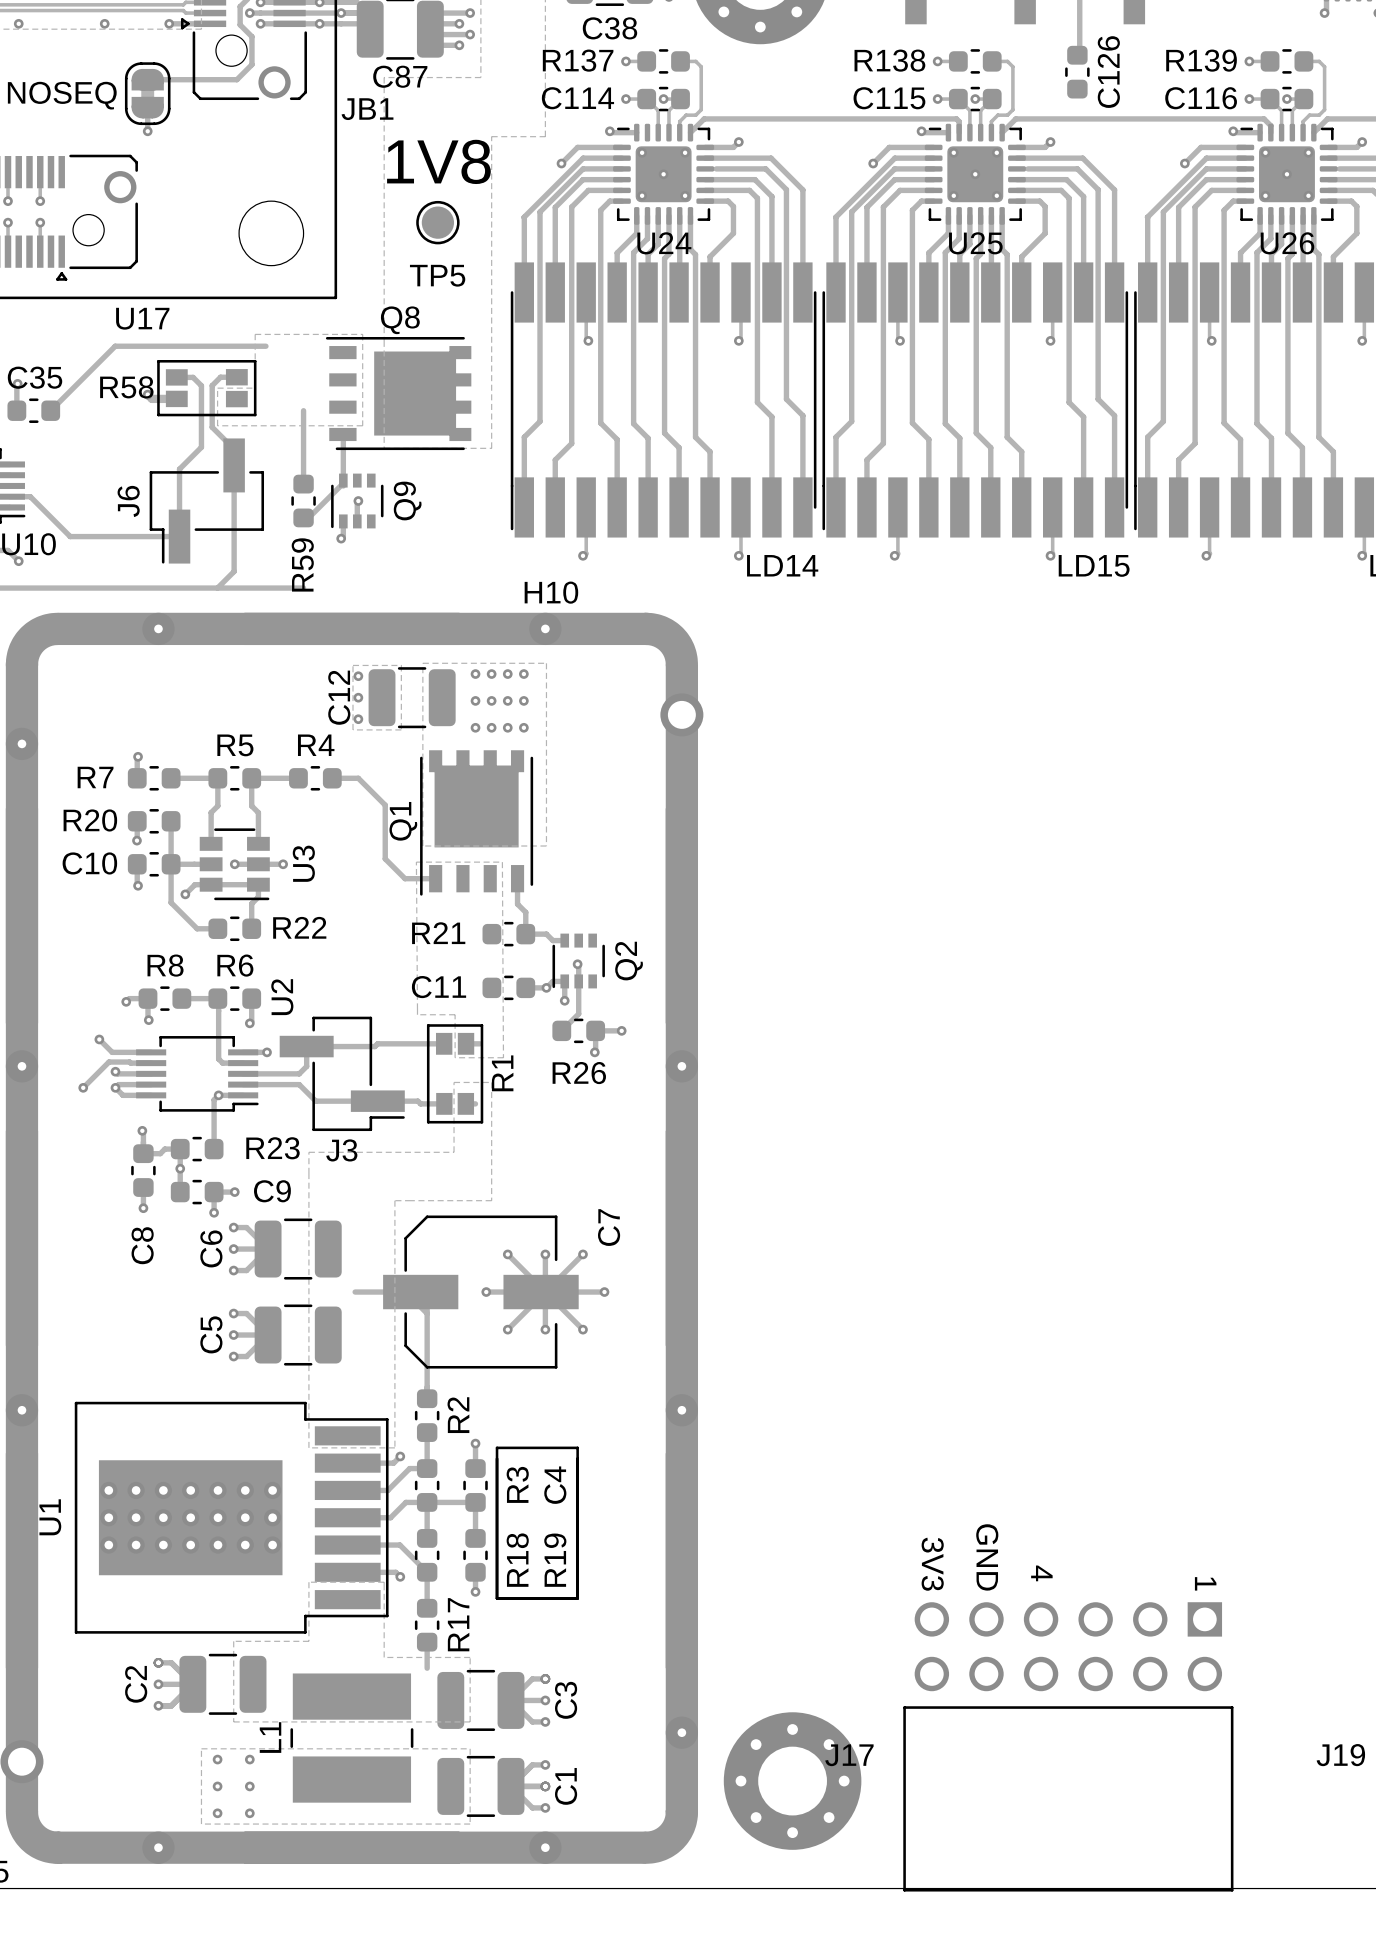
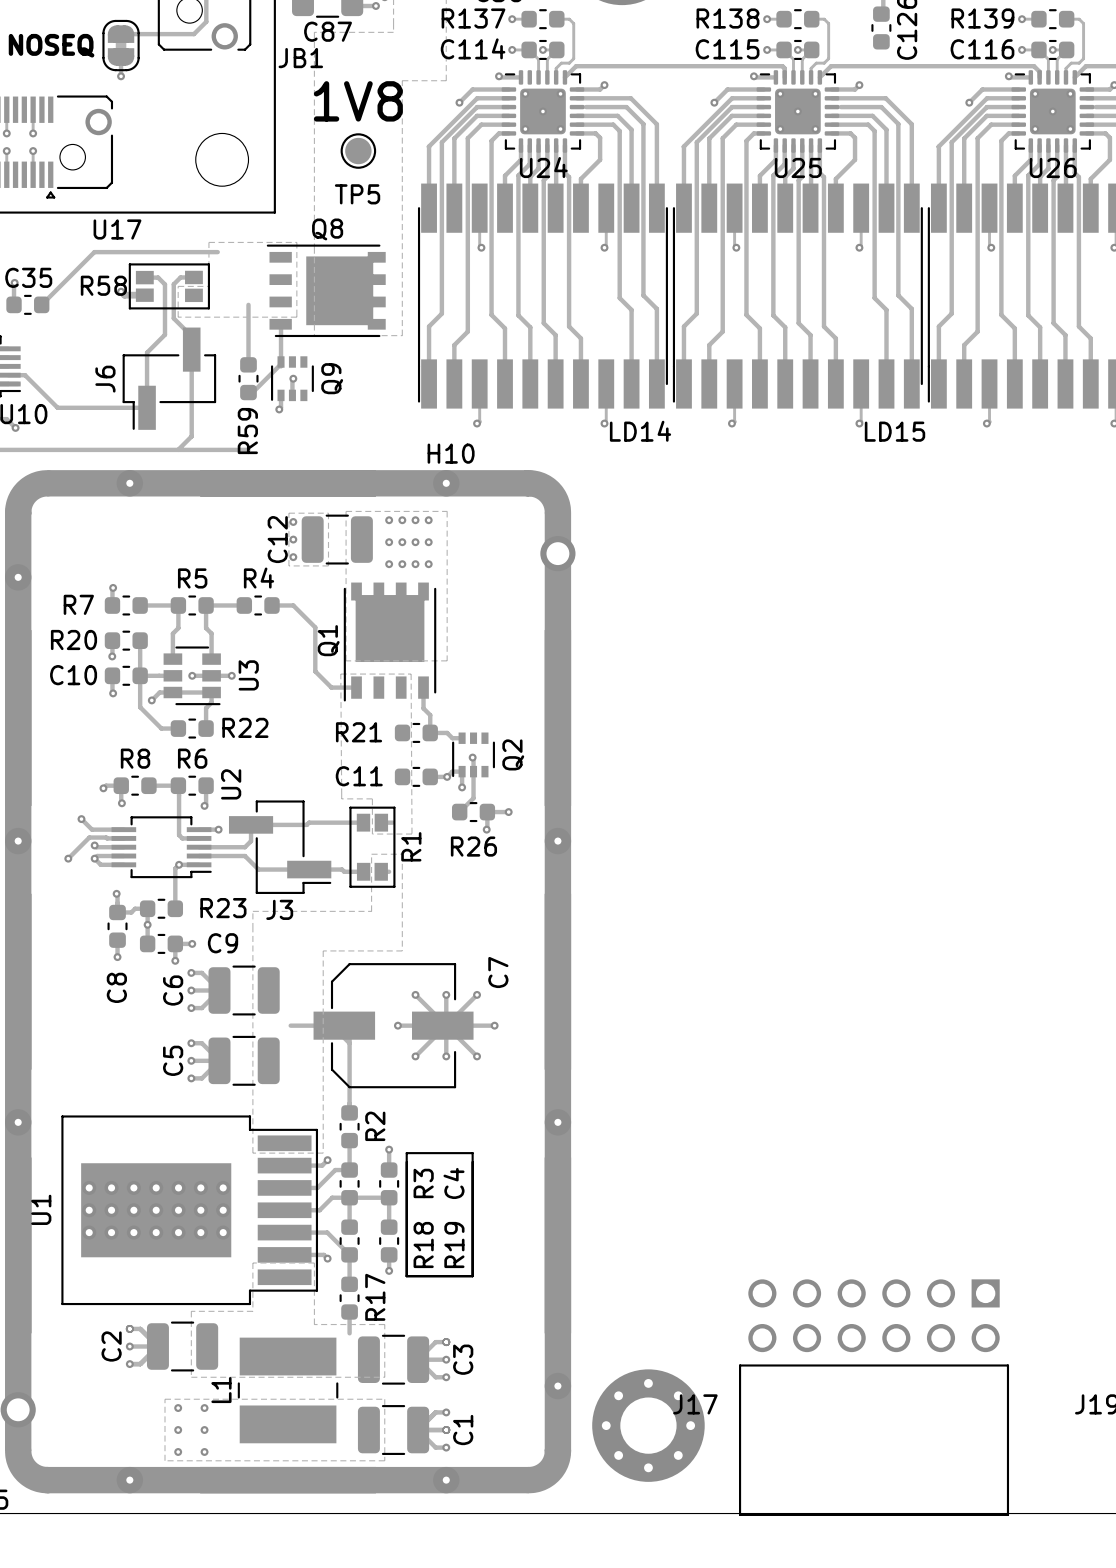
J17 text: GND (987, 1557) -> none
J17 text: 3V3 (932, 1564) -> none
J17 text: 4 (1041, 1573) -> none
J17 text: 1 (1205, 1583) -> none

